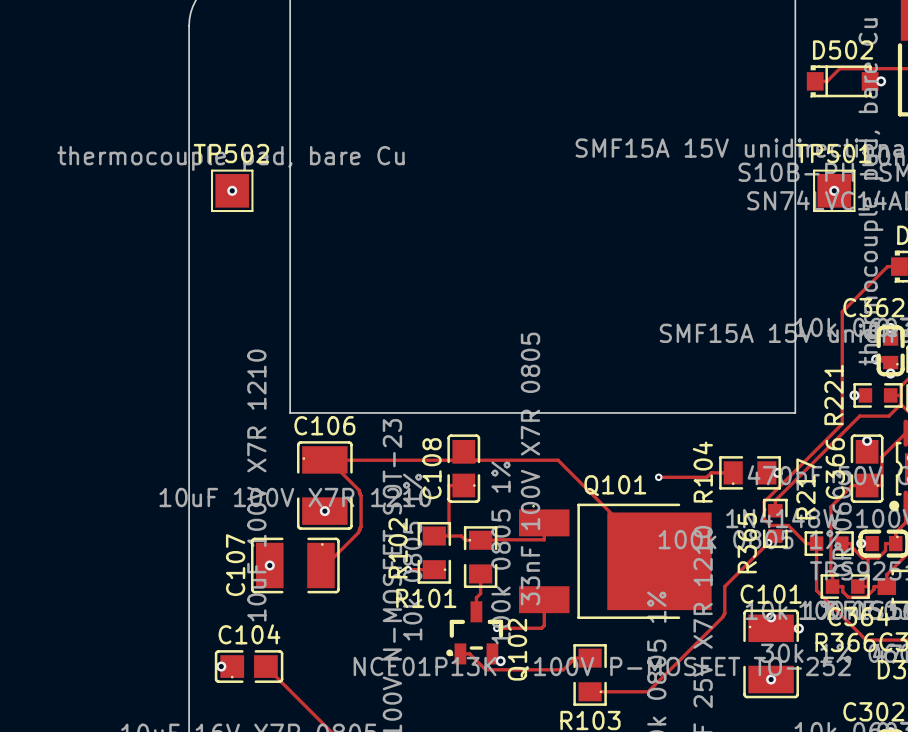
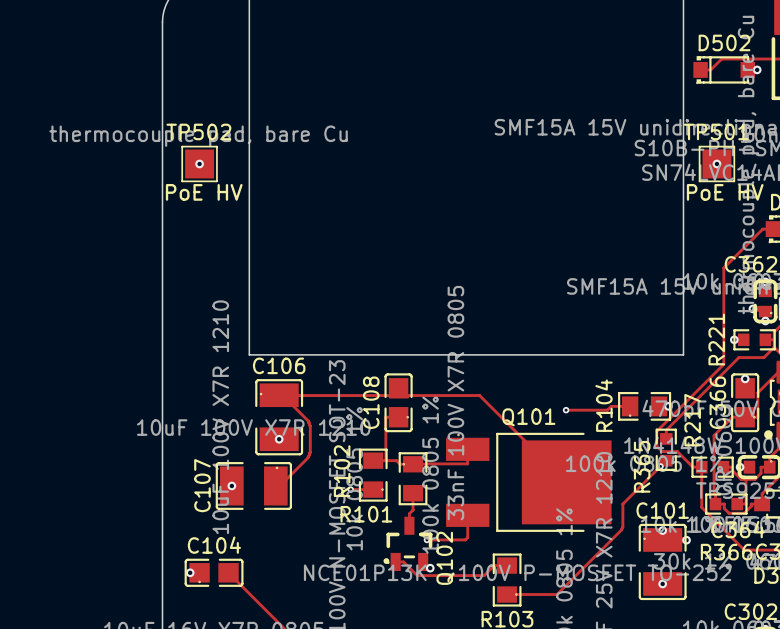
text: none -> PoE HV (204, 192)
text: none -> PoE HV (725, 192)

